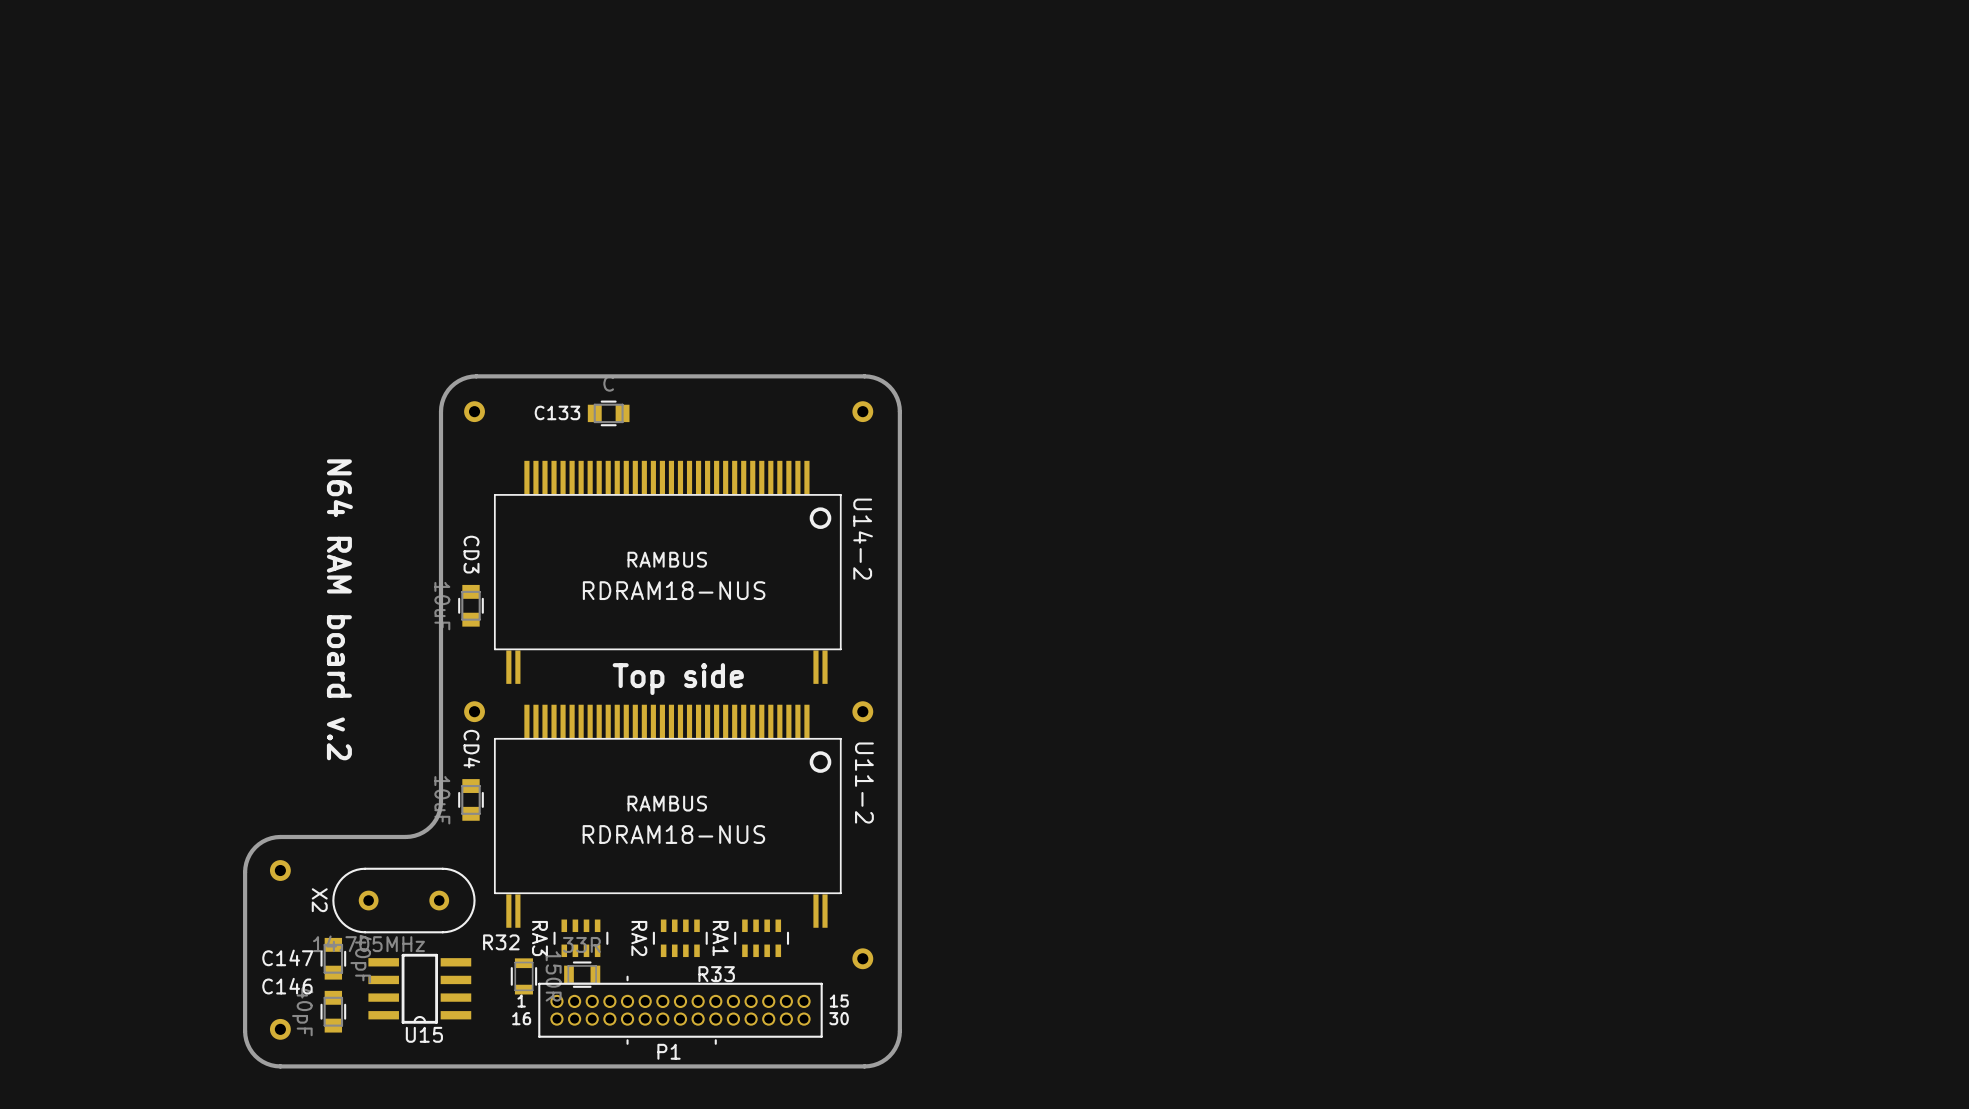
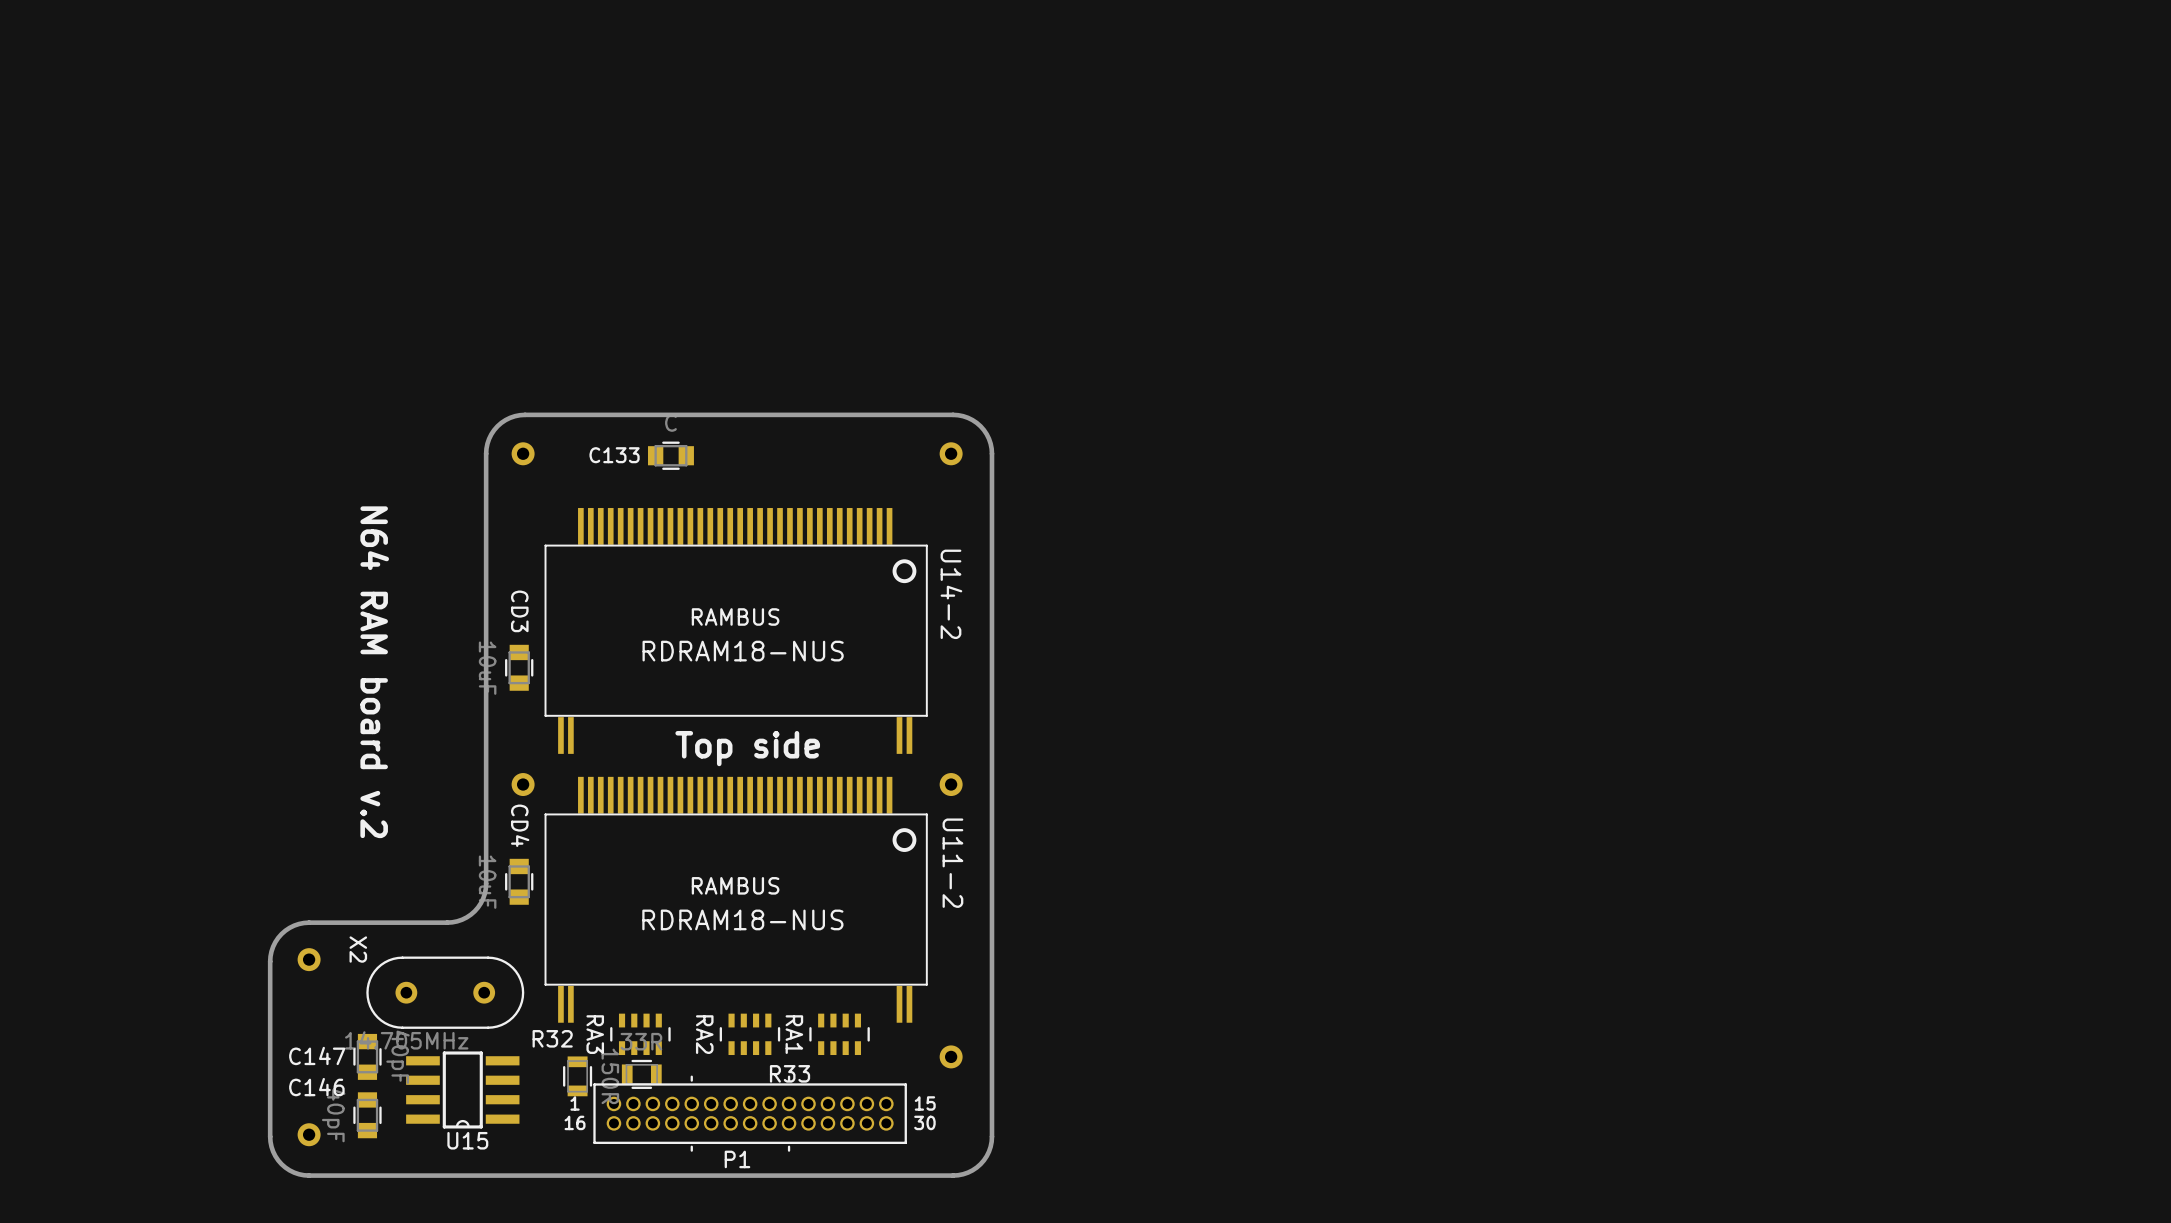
X2 name position: X2 (319, 900) -> X2 (358, 949)

